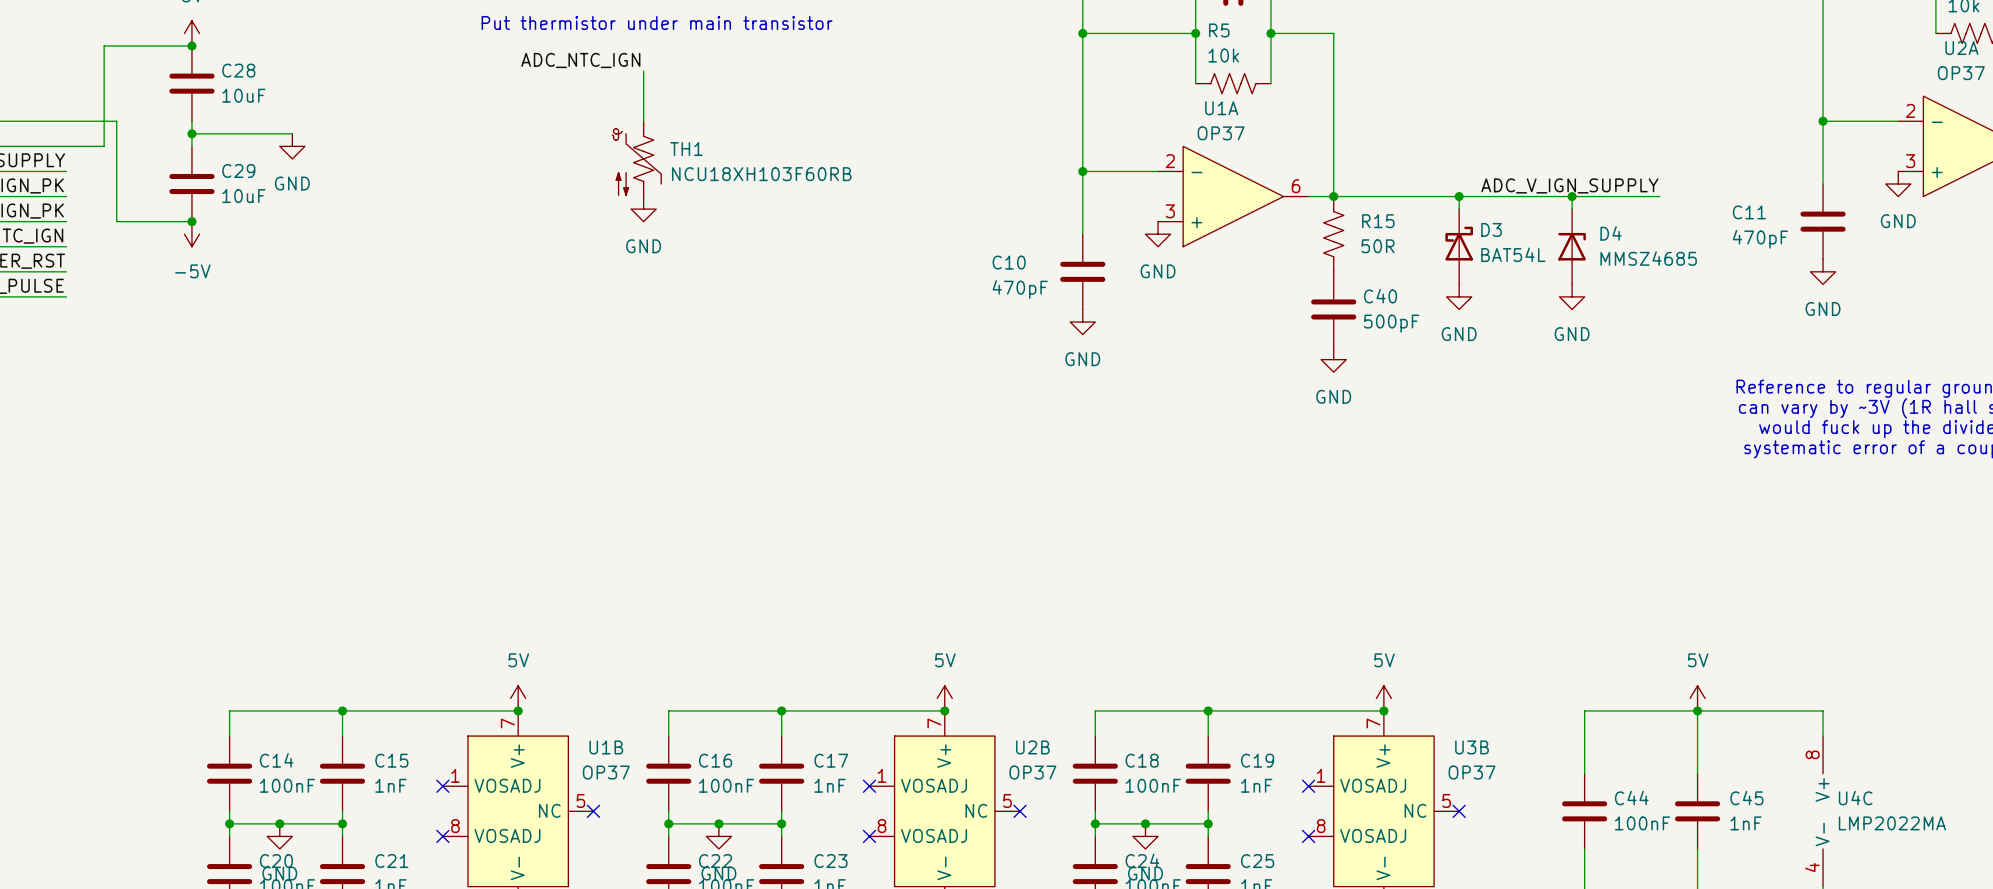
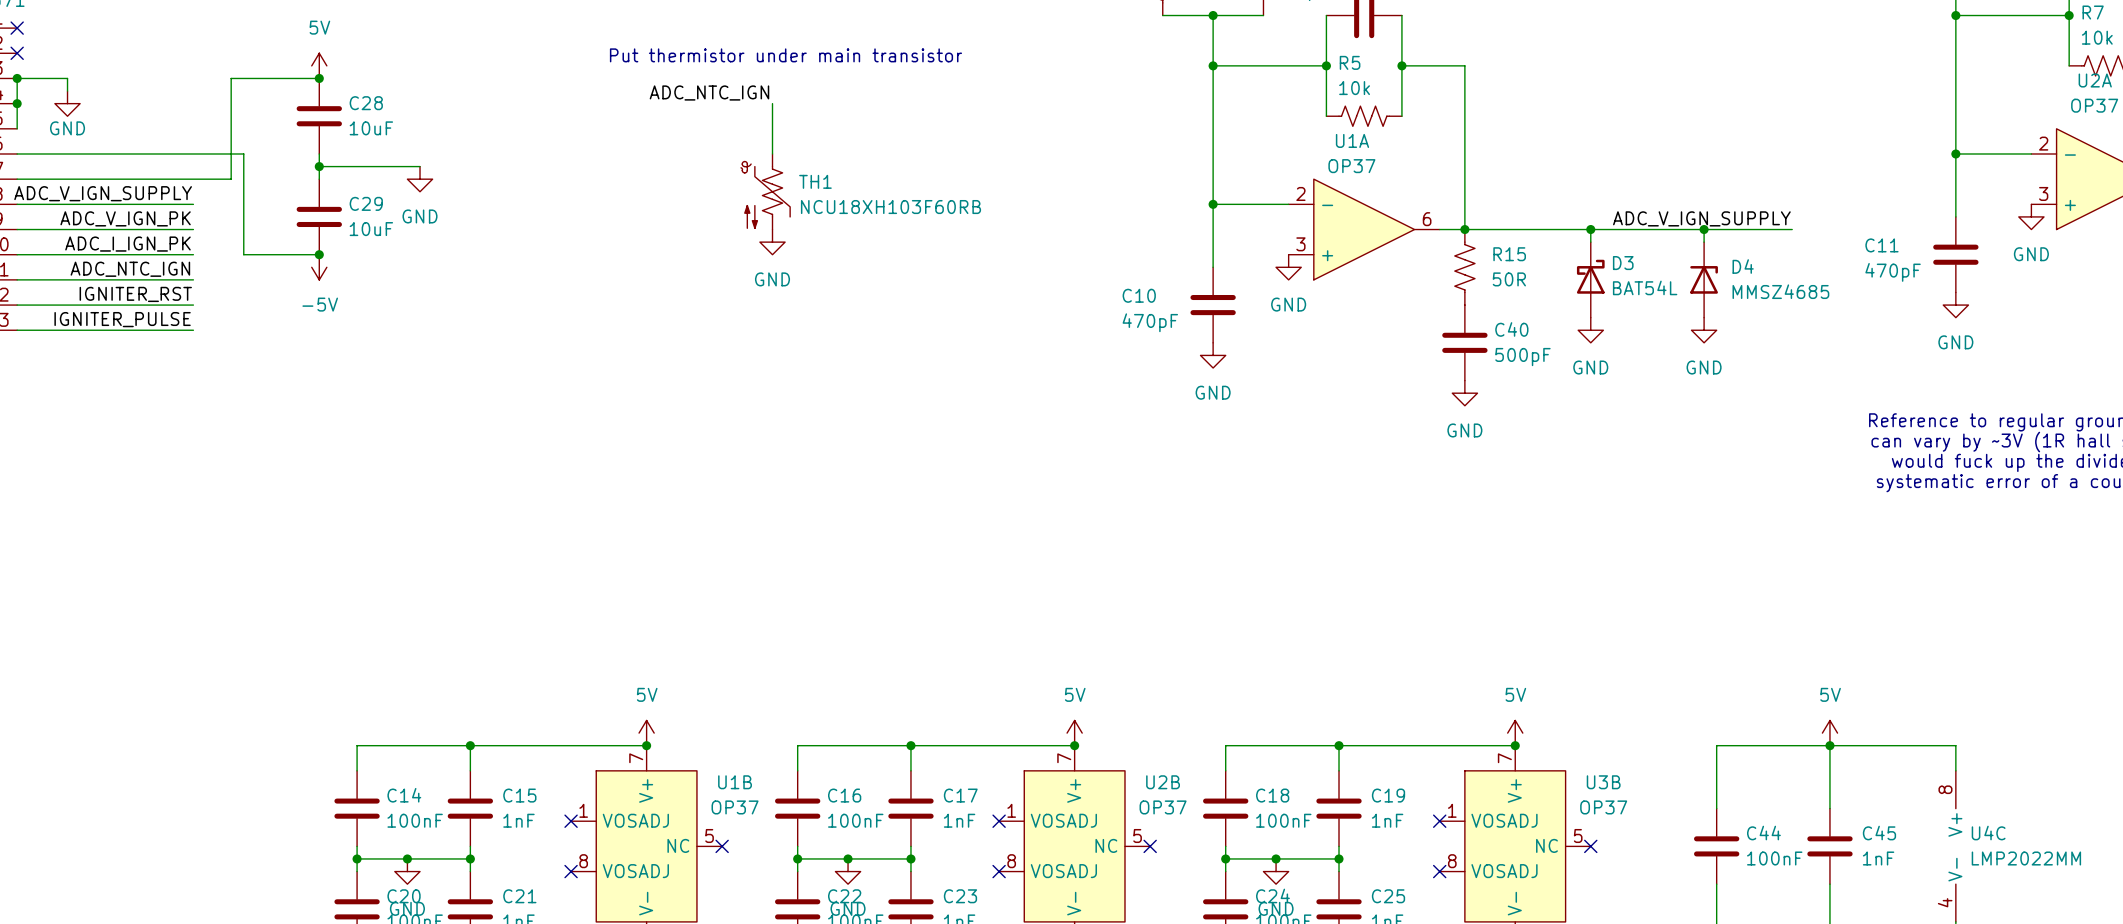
U4C value: LMP2022MA (1892, 823) -> LMP2022MM (2026, 858)

